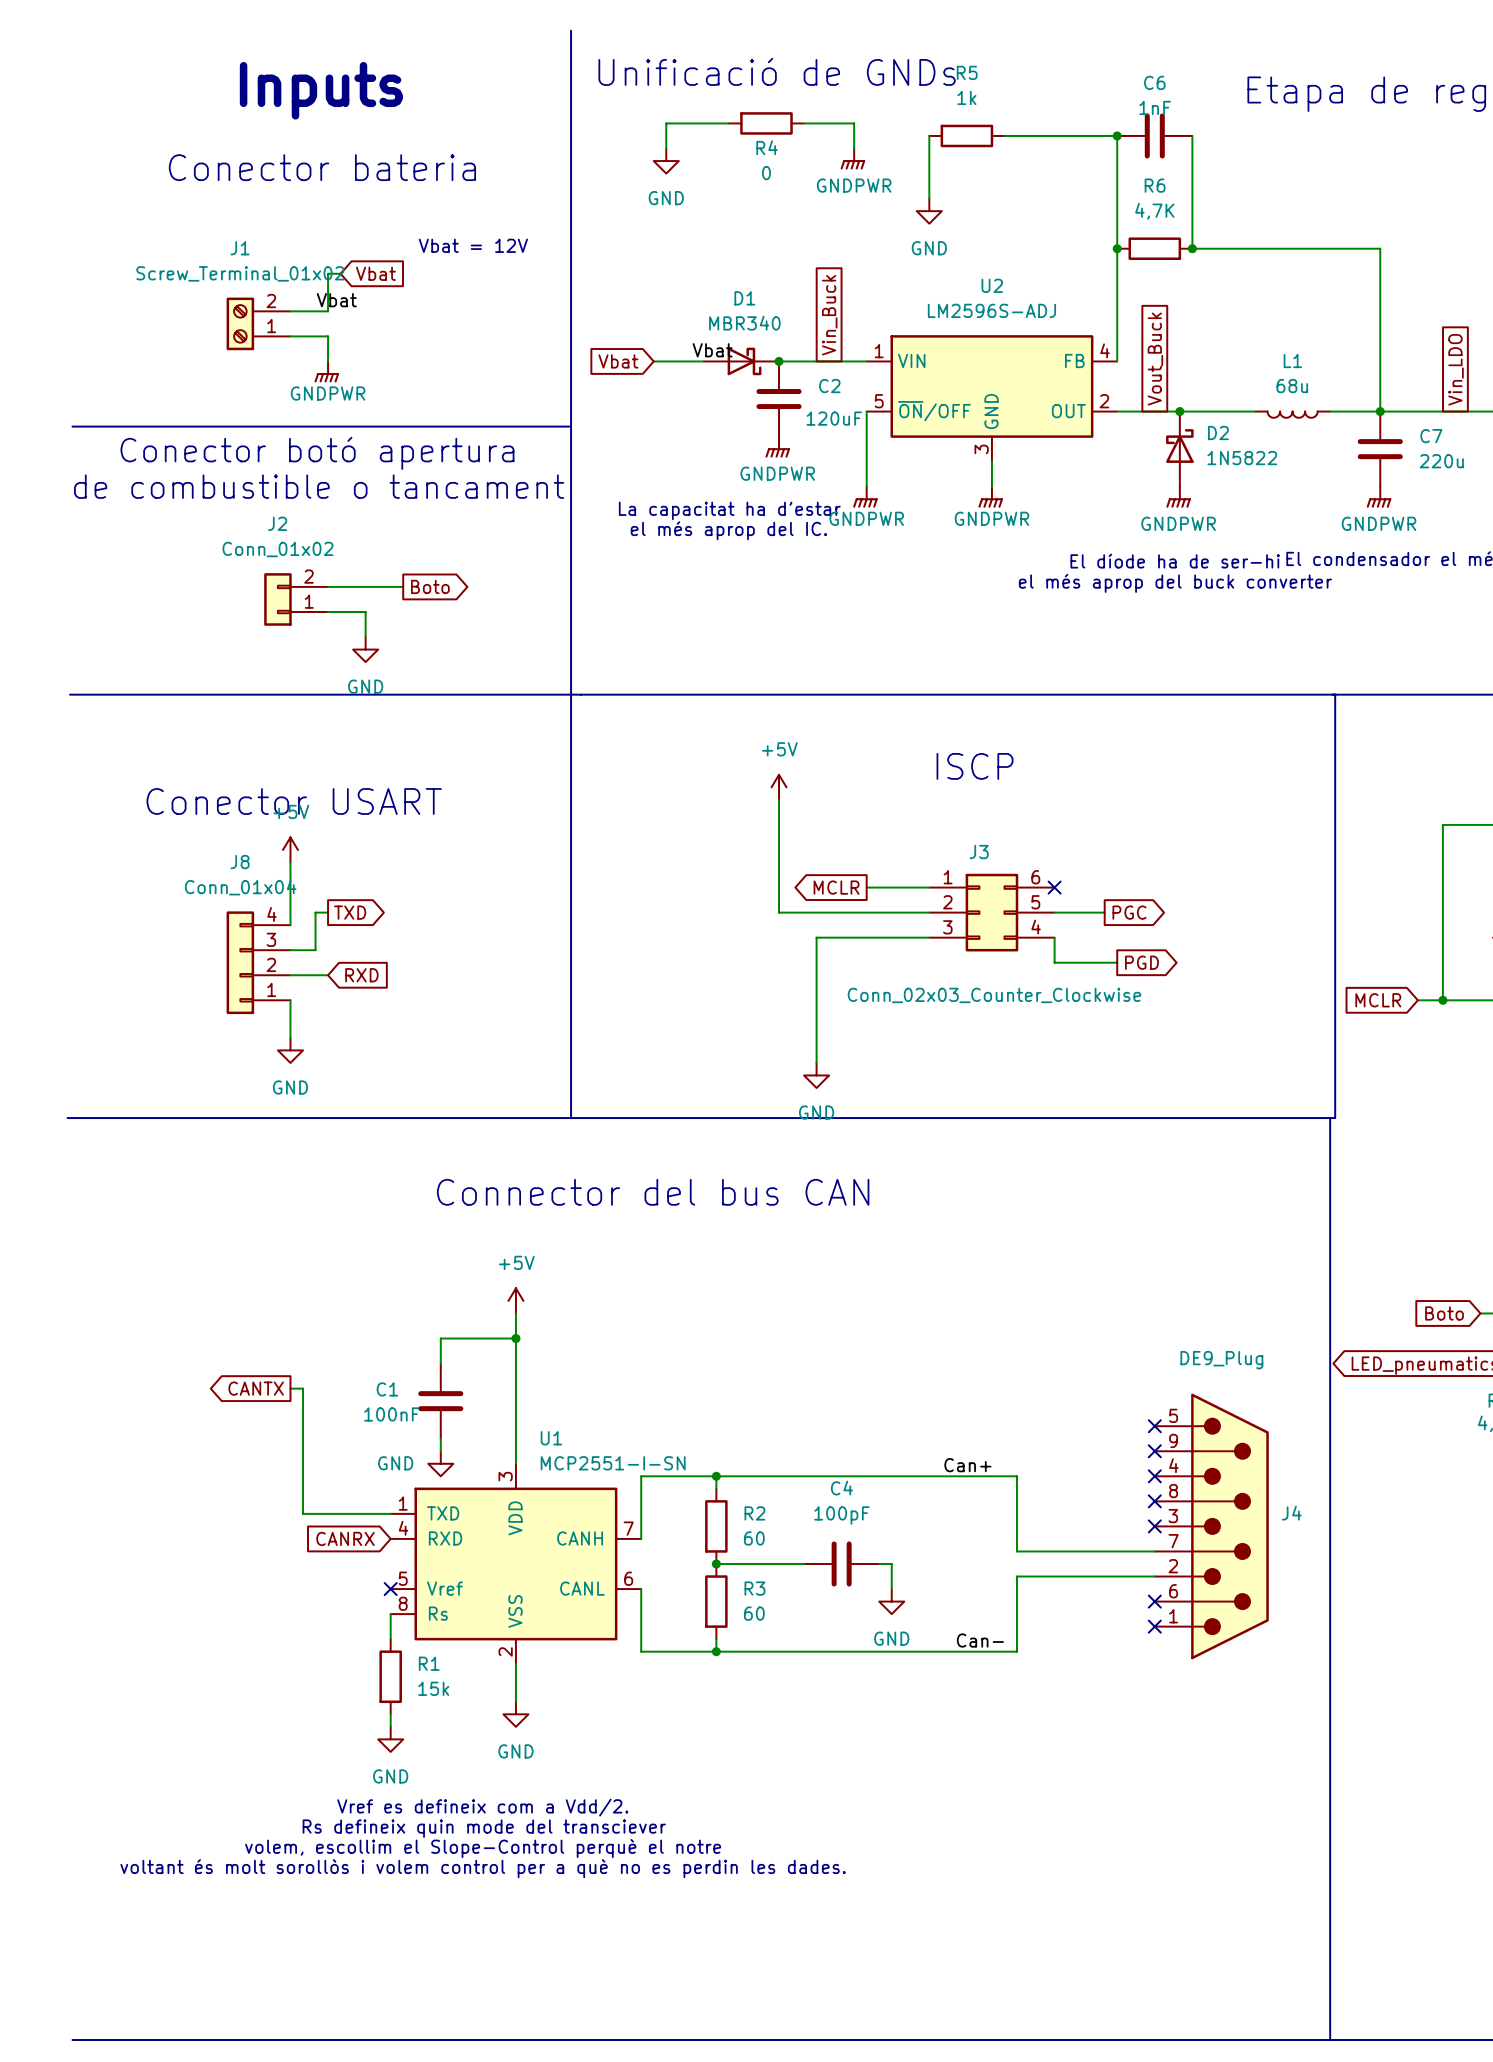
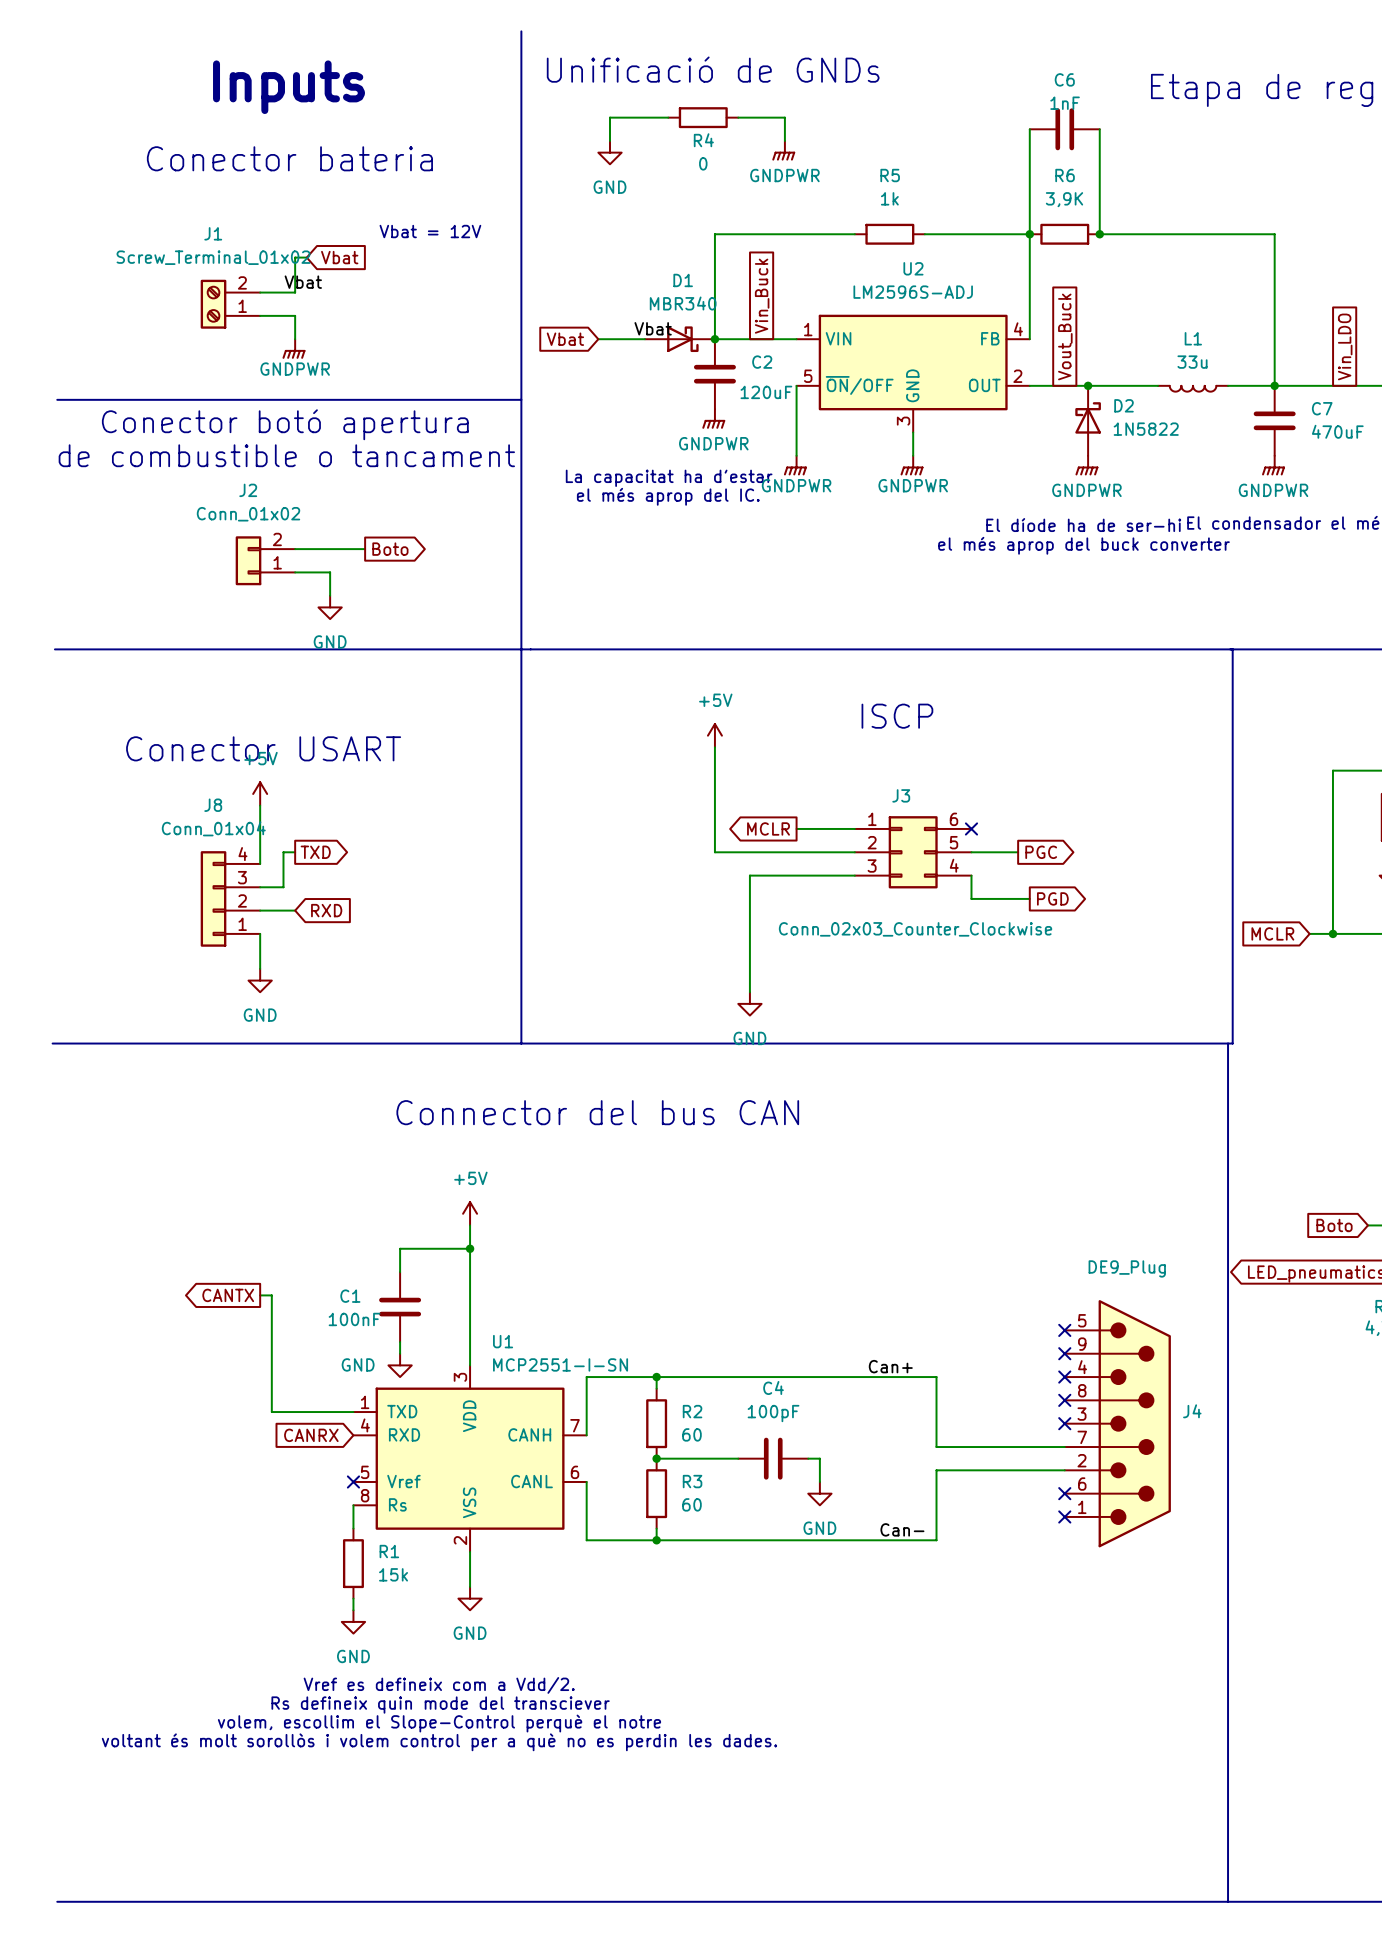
wire: (929, 135) (929, 198) -> none
R5 position: (966, 135) -> (889, 234)
wire: (1004, 135) (1117, 135) -> (924, 234) (1029, 234)
junction: (1117, 135) -> none
power symbol: GND (929, 211) -> none
R6 value: 4,7K (1154, 211) -> 3,9K (1064, 199)
wire: none -> (854, 234) (714, 234) (714, 339)
L1 value: 68u (1292, 386) -> 33u (1192, 362)
C7 value: 220u (1441, 461) -> 470uF (1337, 431)

